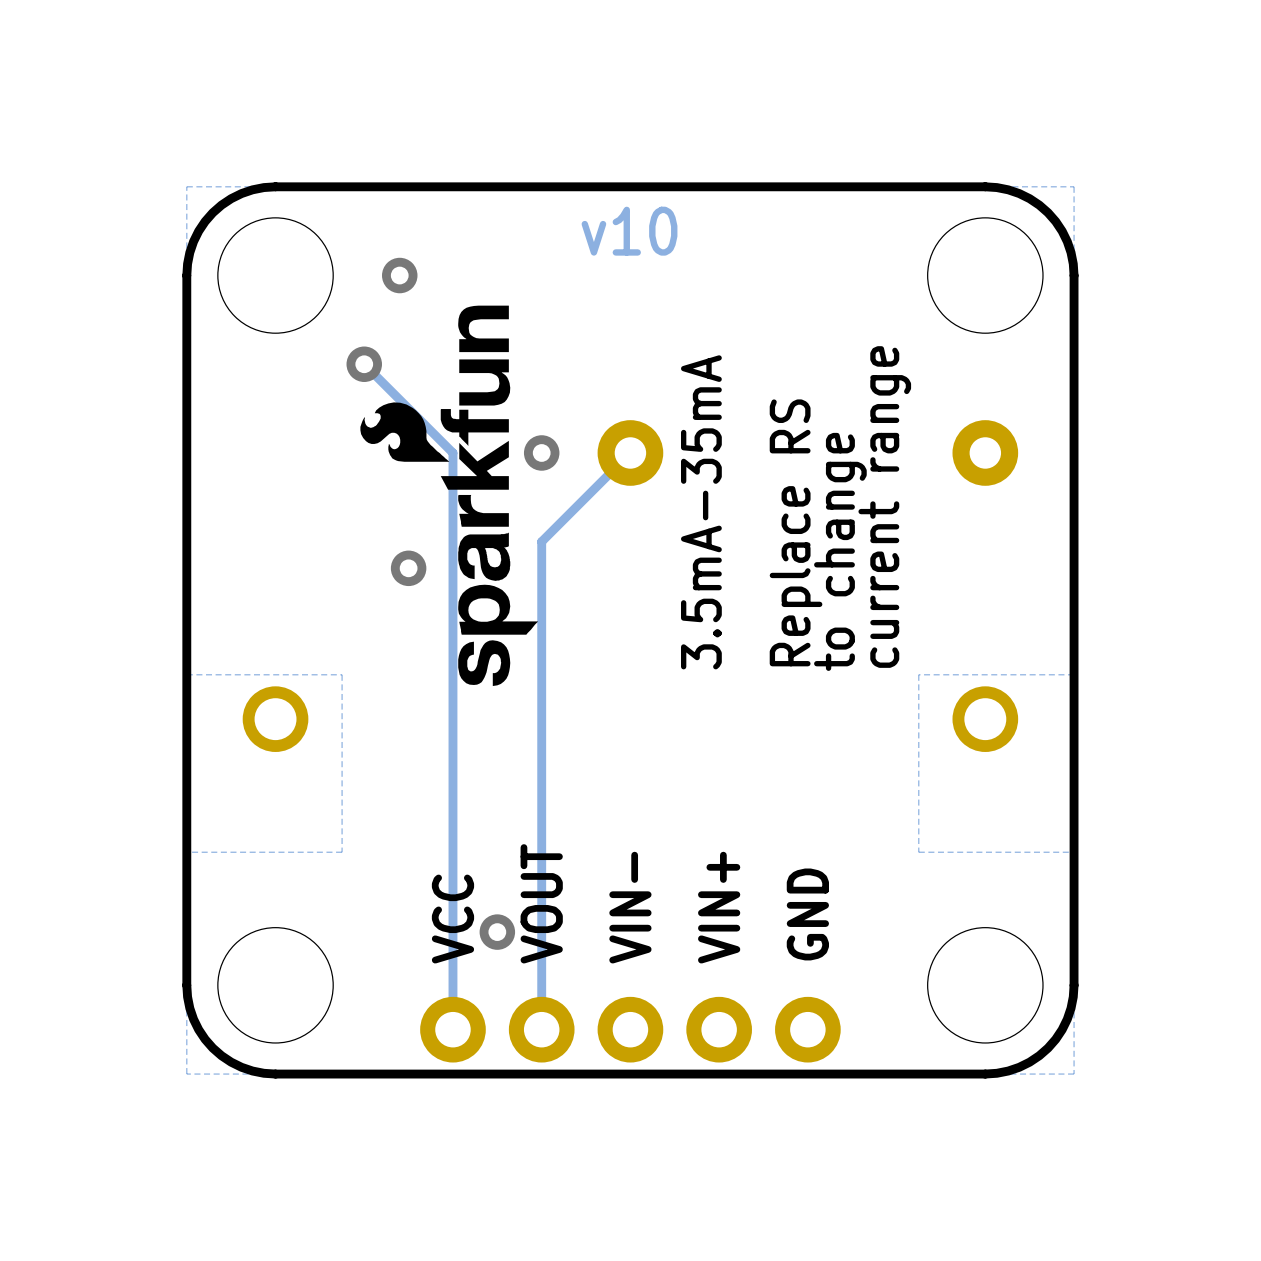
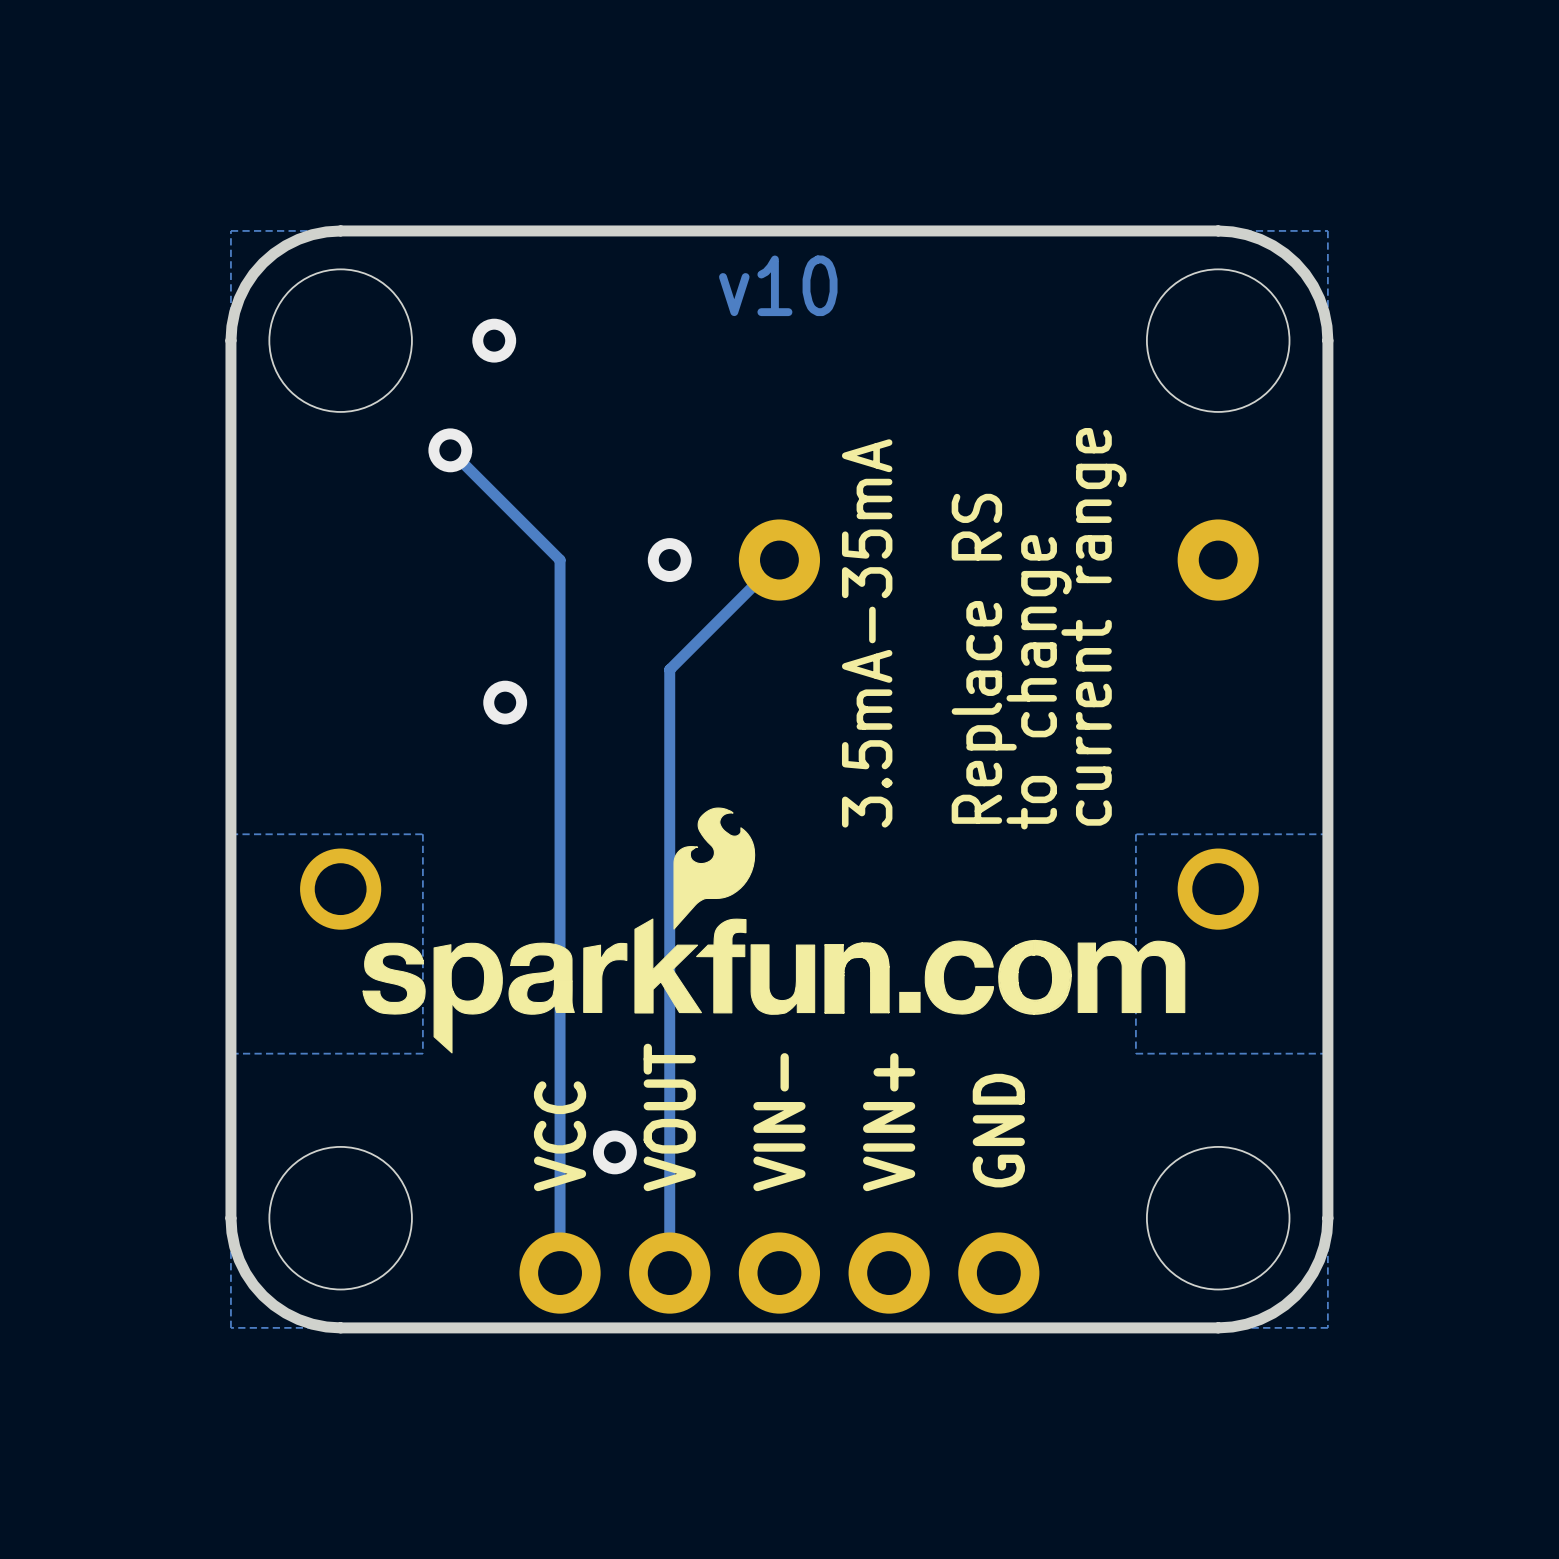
drawing: [360, 305, 539, 687] -> none
drawing: none -> [362, 807, 1186, 1054]

